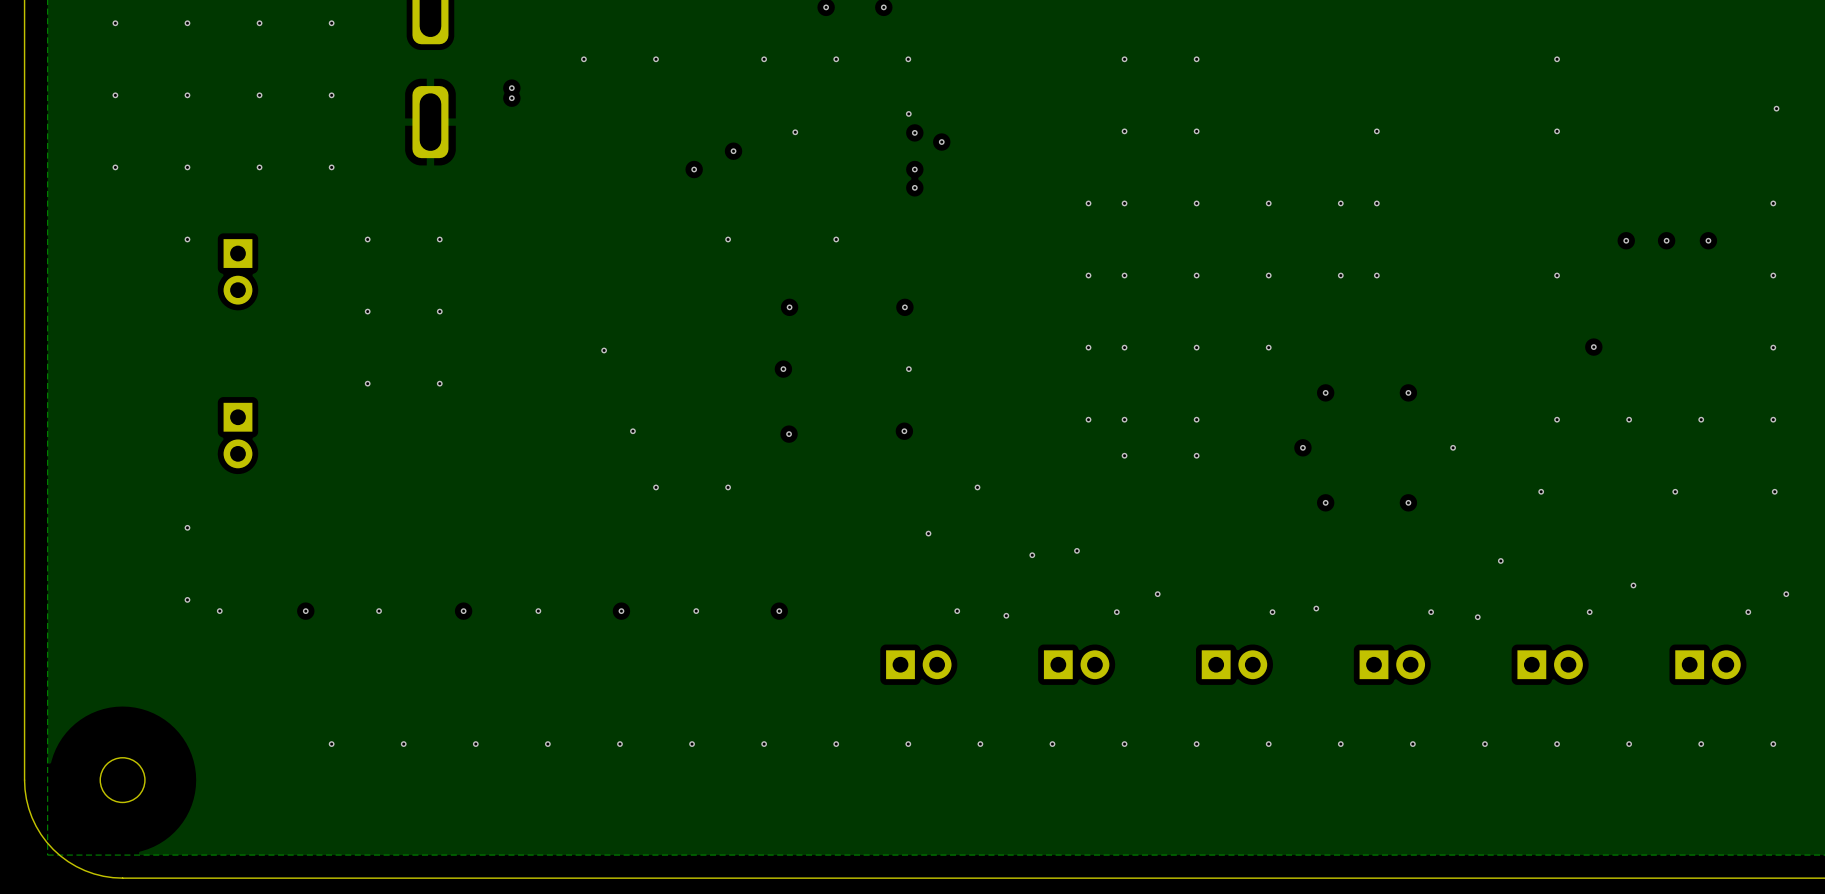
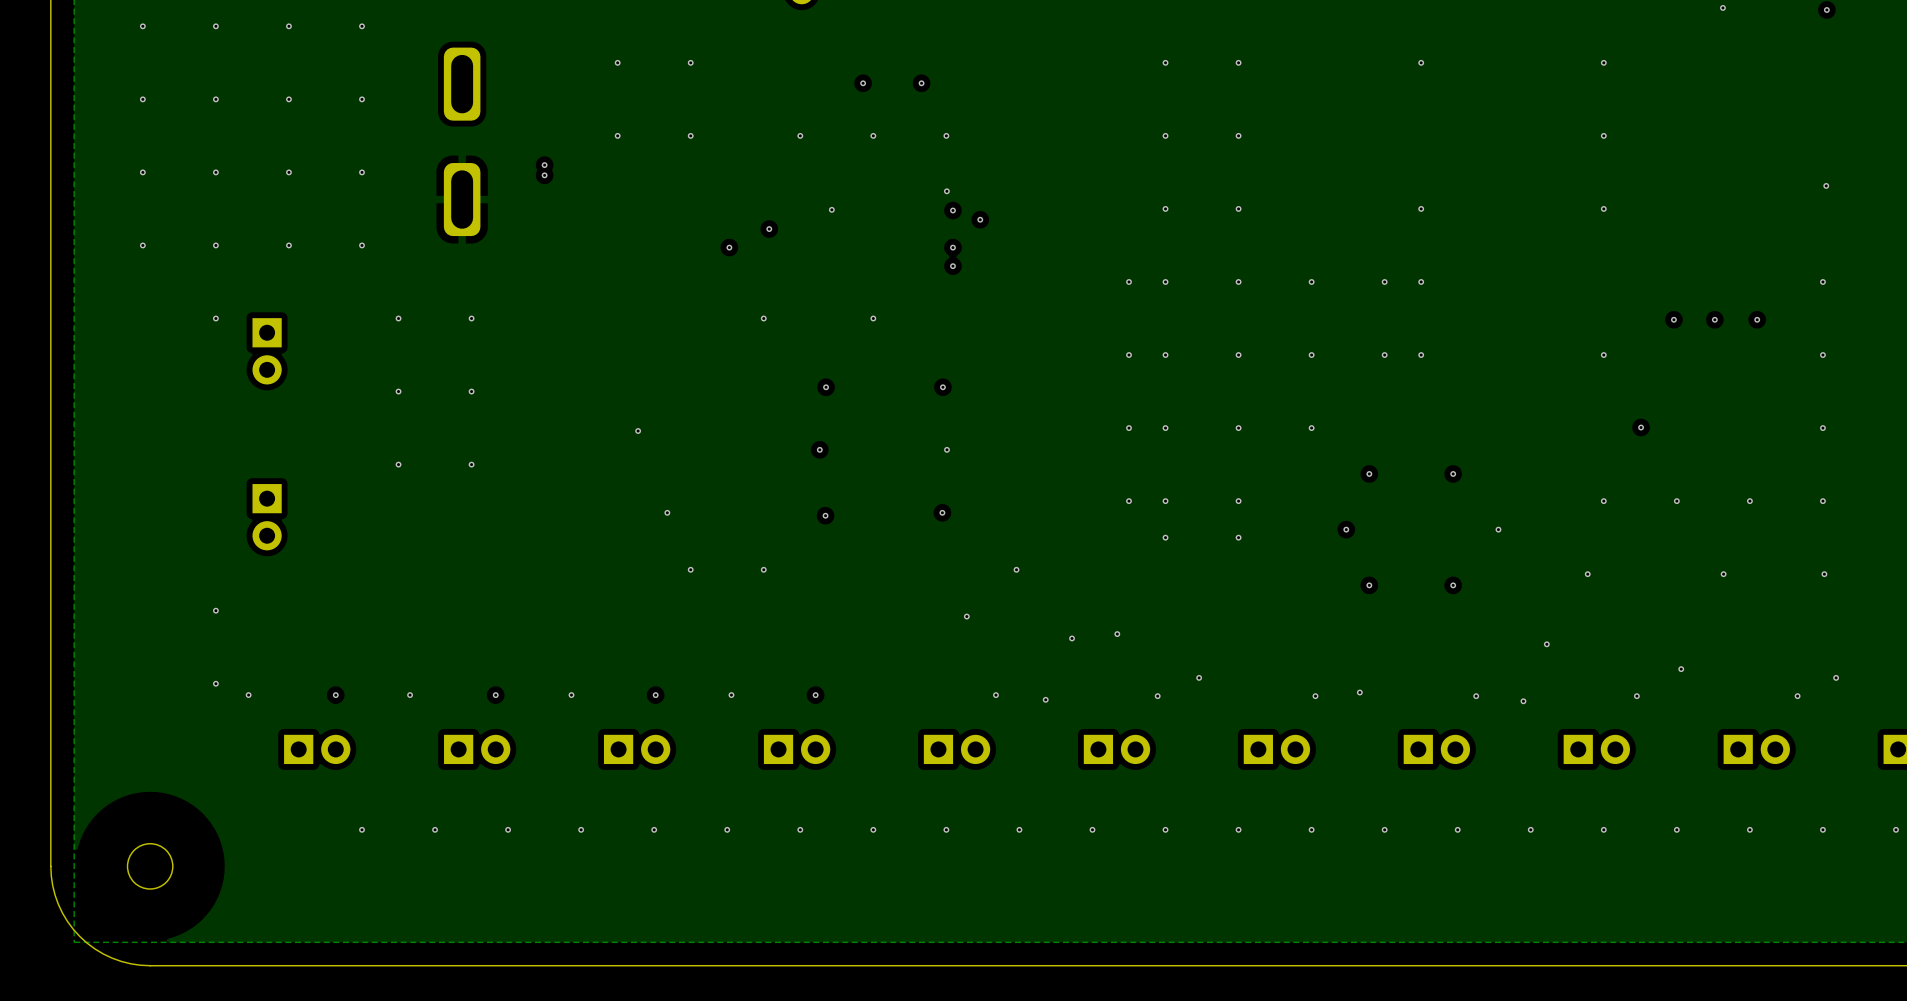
part: none -> (317, 749)
part: none -> (477, 749)
part: none -> (637, 749)
part: none -> (797, 749)

